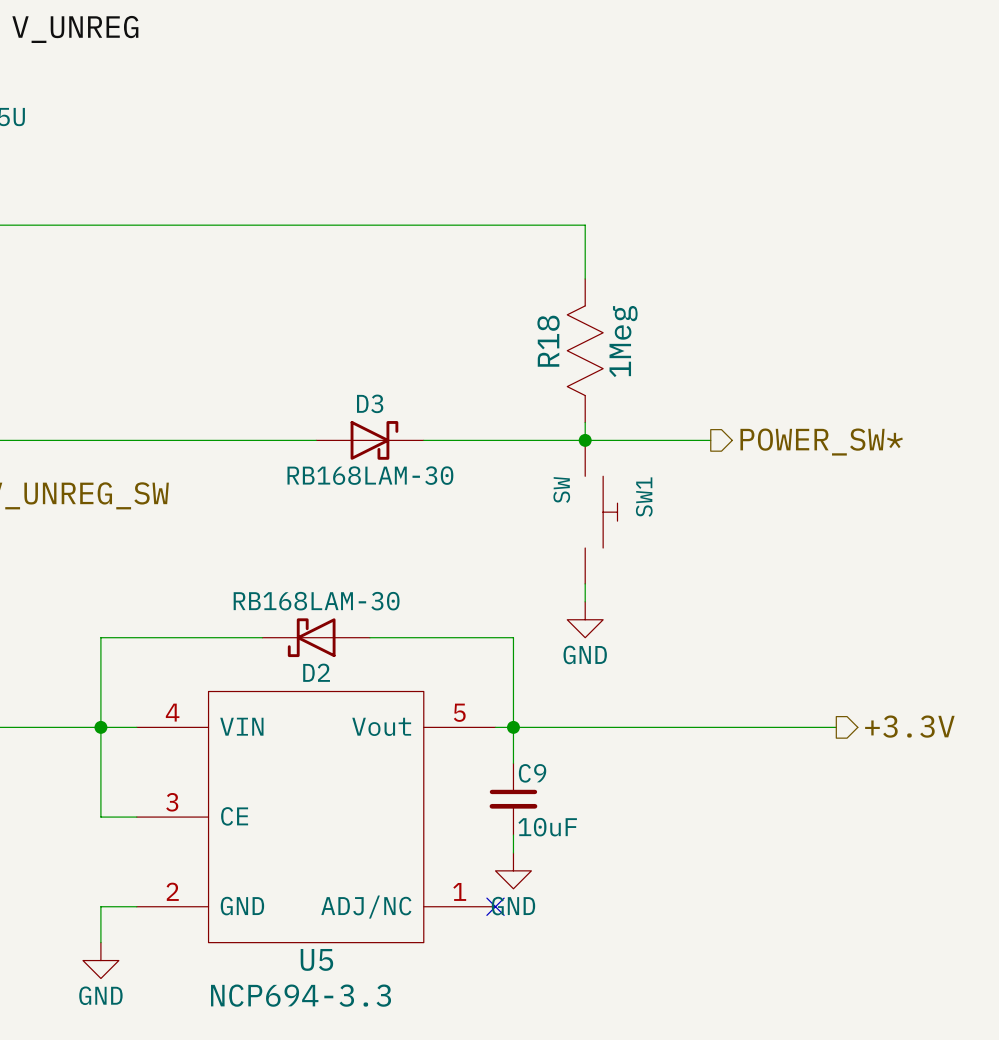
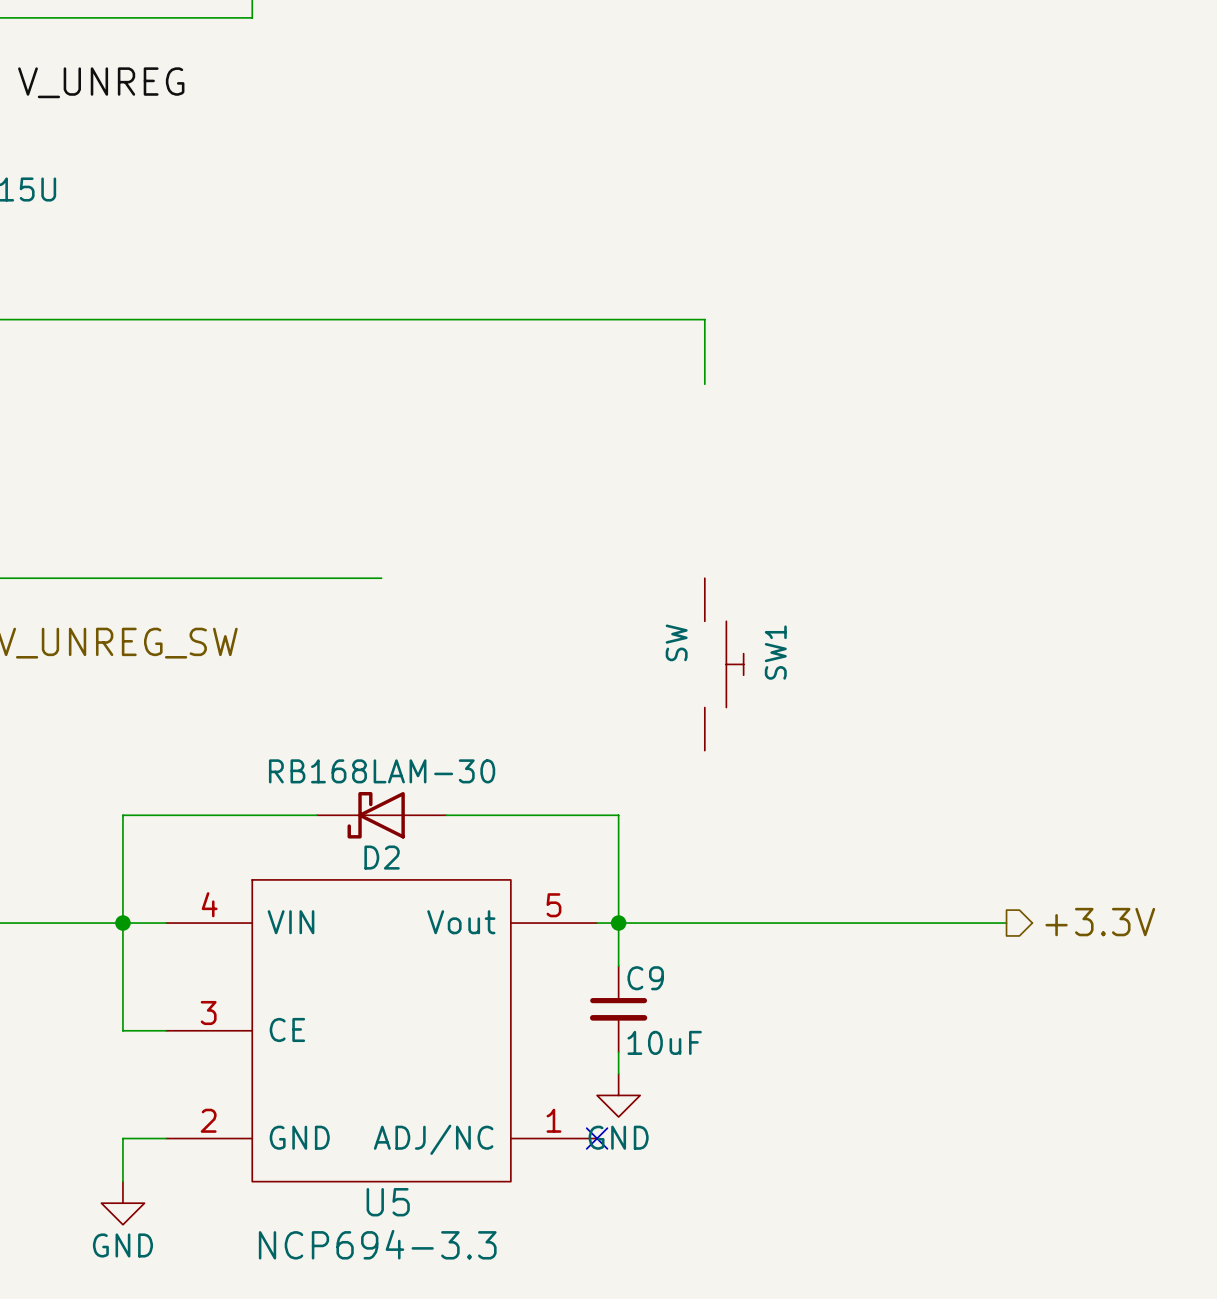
R18: 1Meg (585, 350) -> none
wire: (585, 422) (585, 440) -> none
D3: RB168LAM-30 (369, 440) -> none
wire: (423, 440) (710, 440) -> none
junction: (585, 440) -> none
hierarchical label: POWER_SW* (821, 442) -> none
wire: (585, 583) (585, 601) -> none
power symbol: GND (585, 619) -> none

